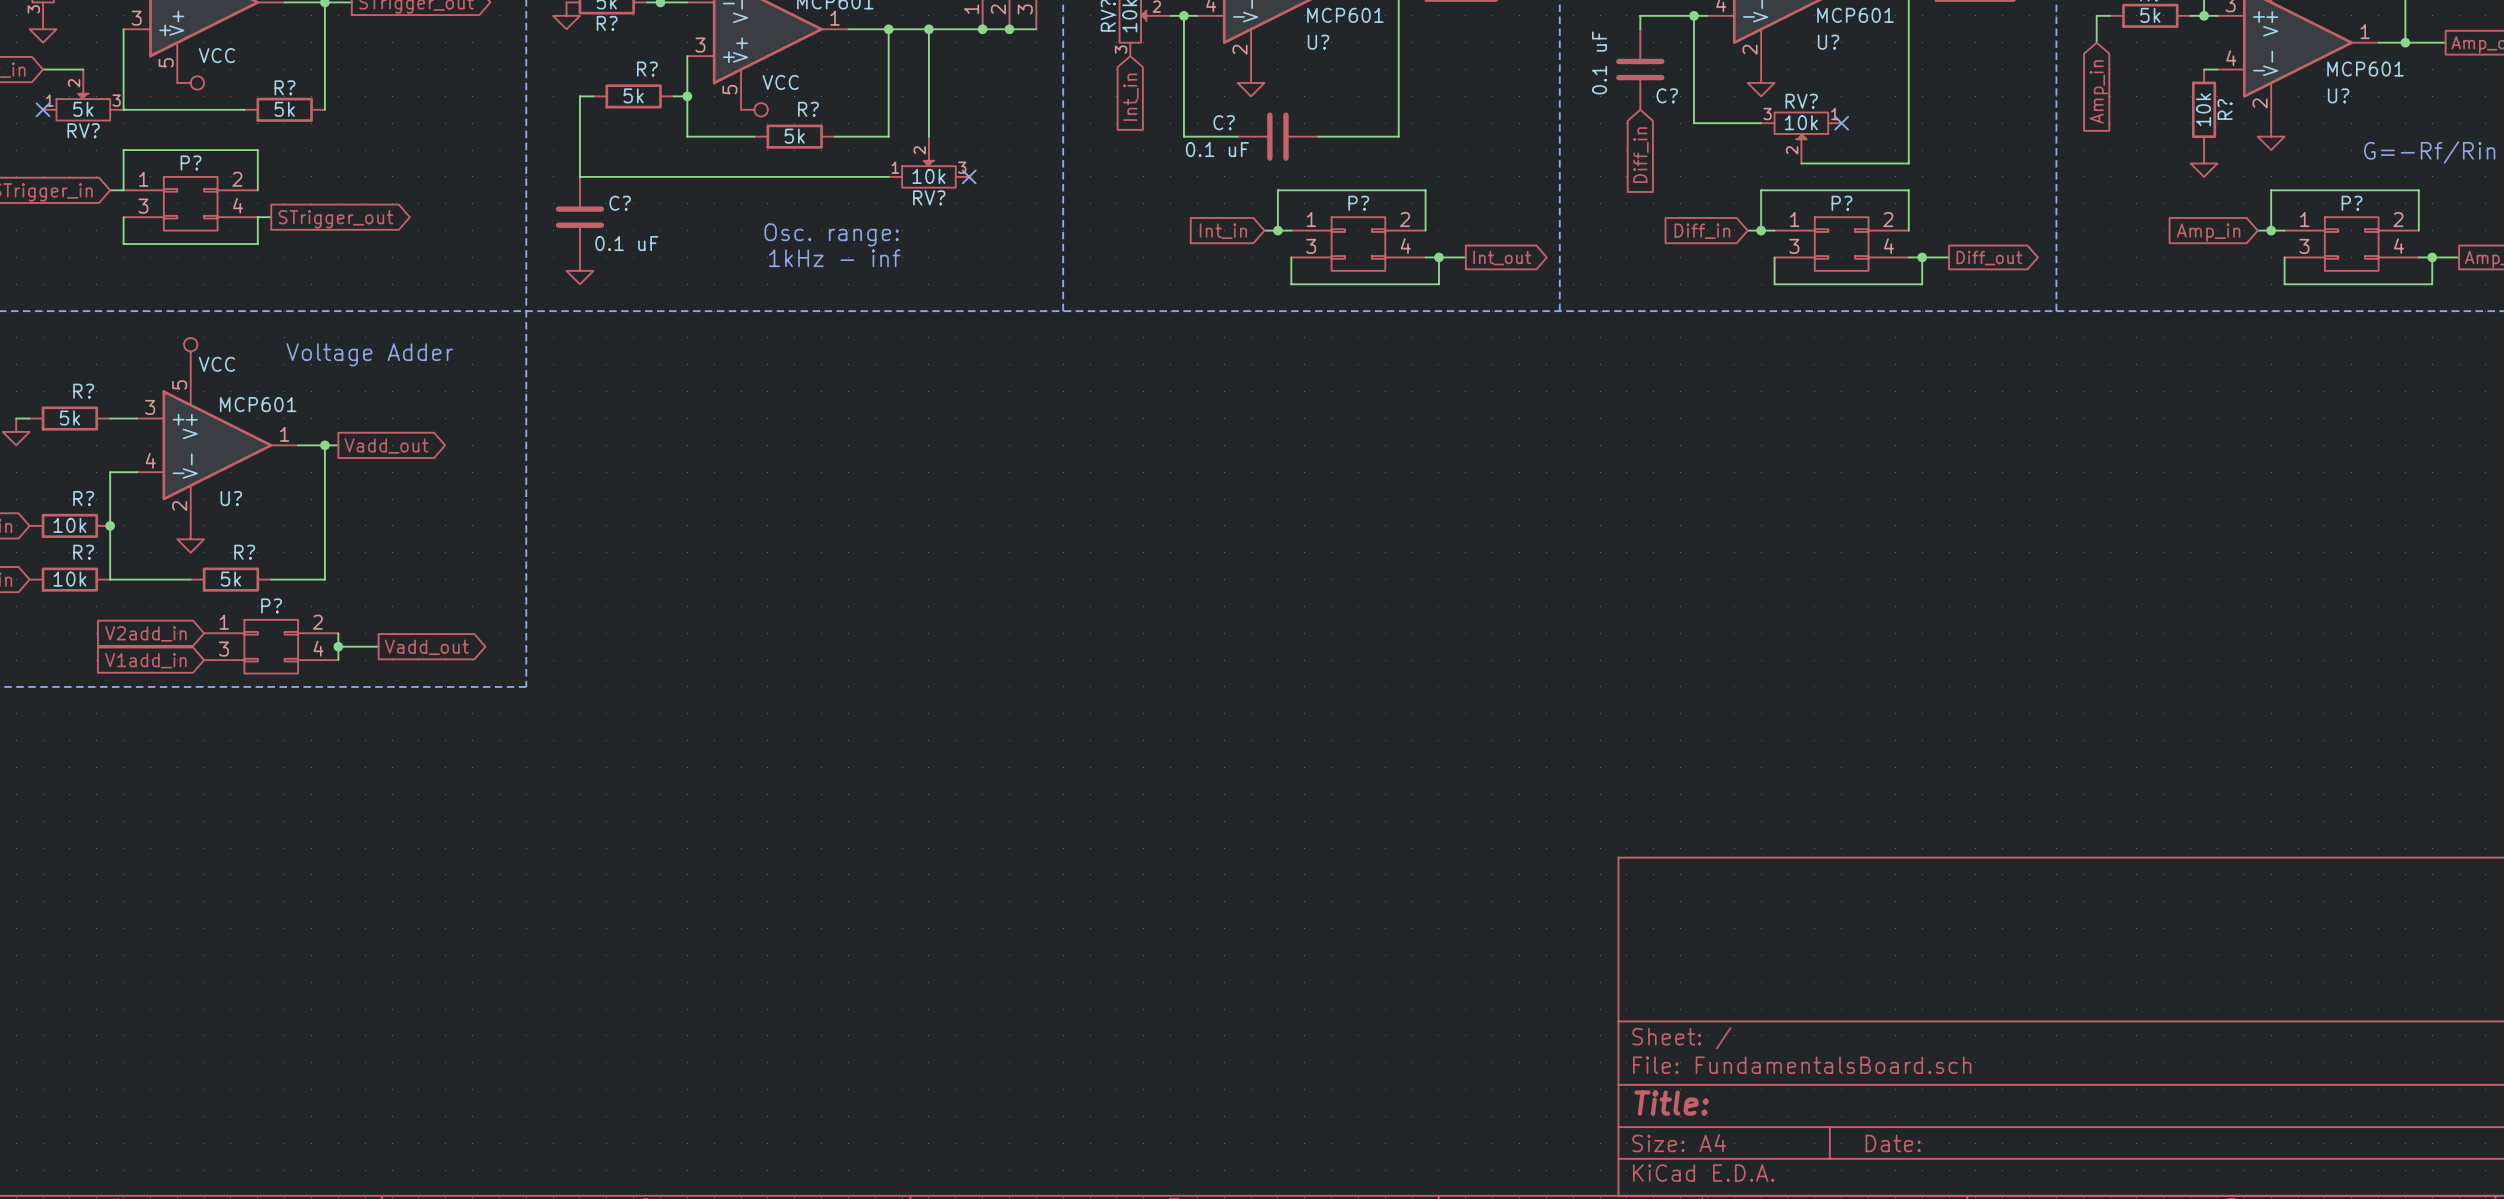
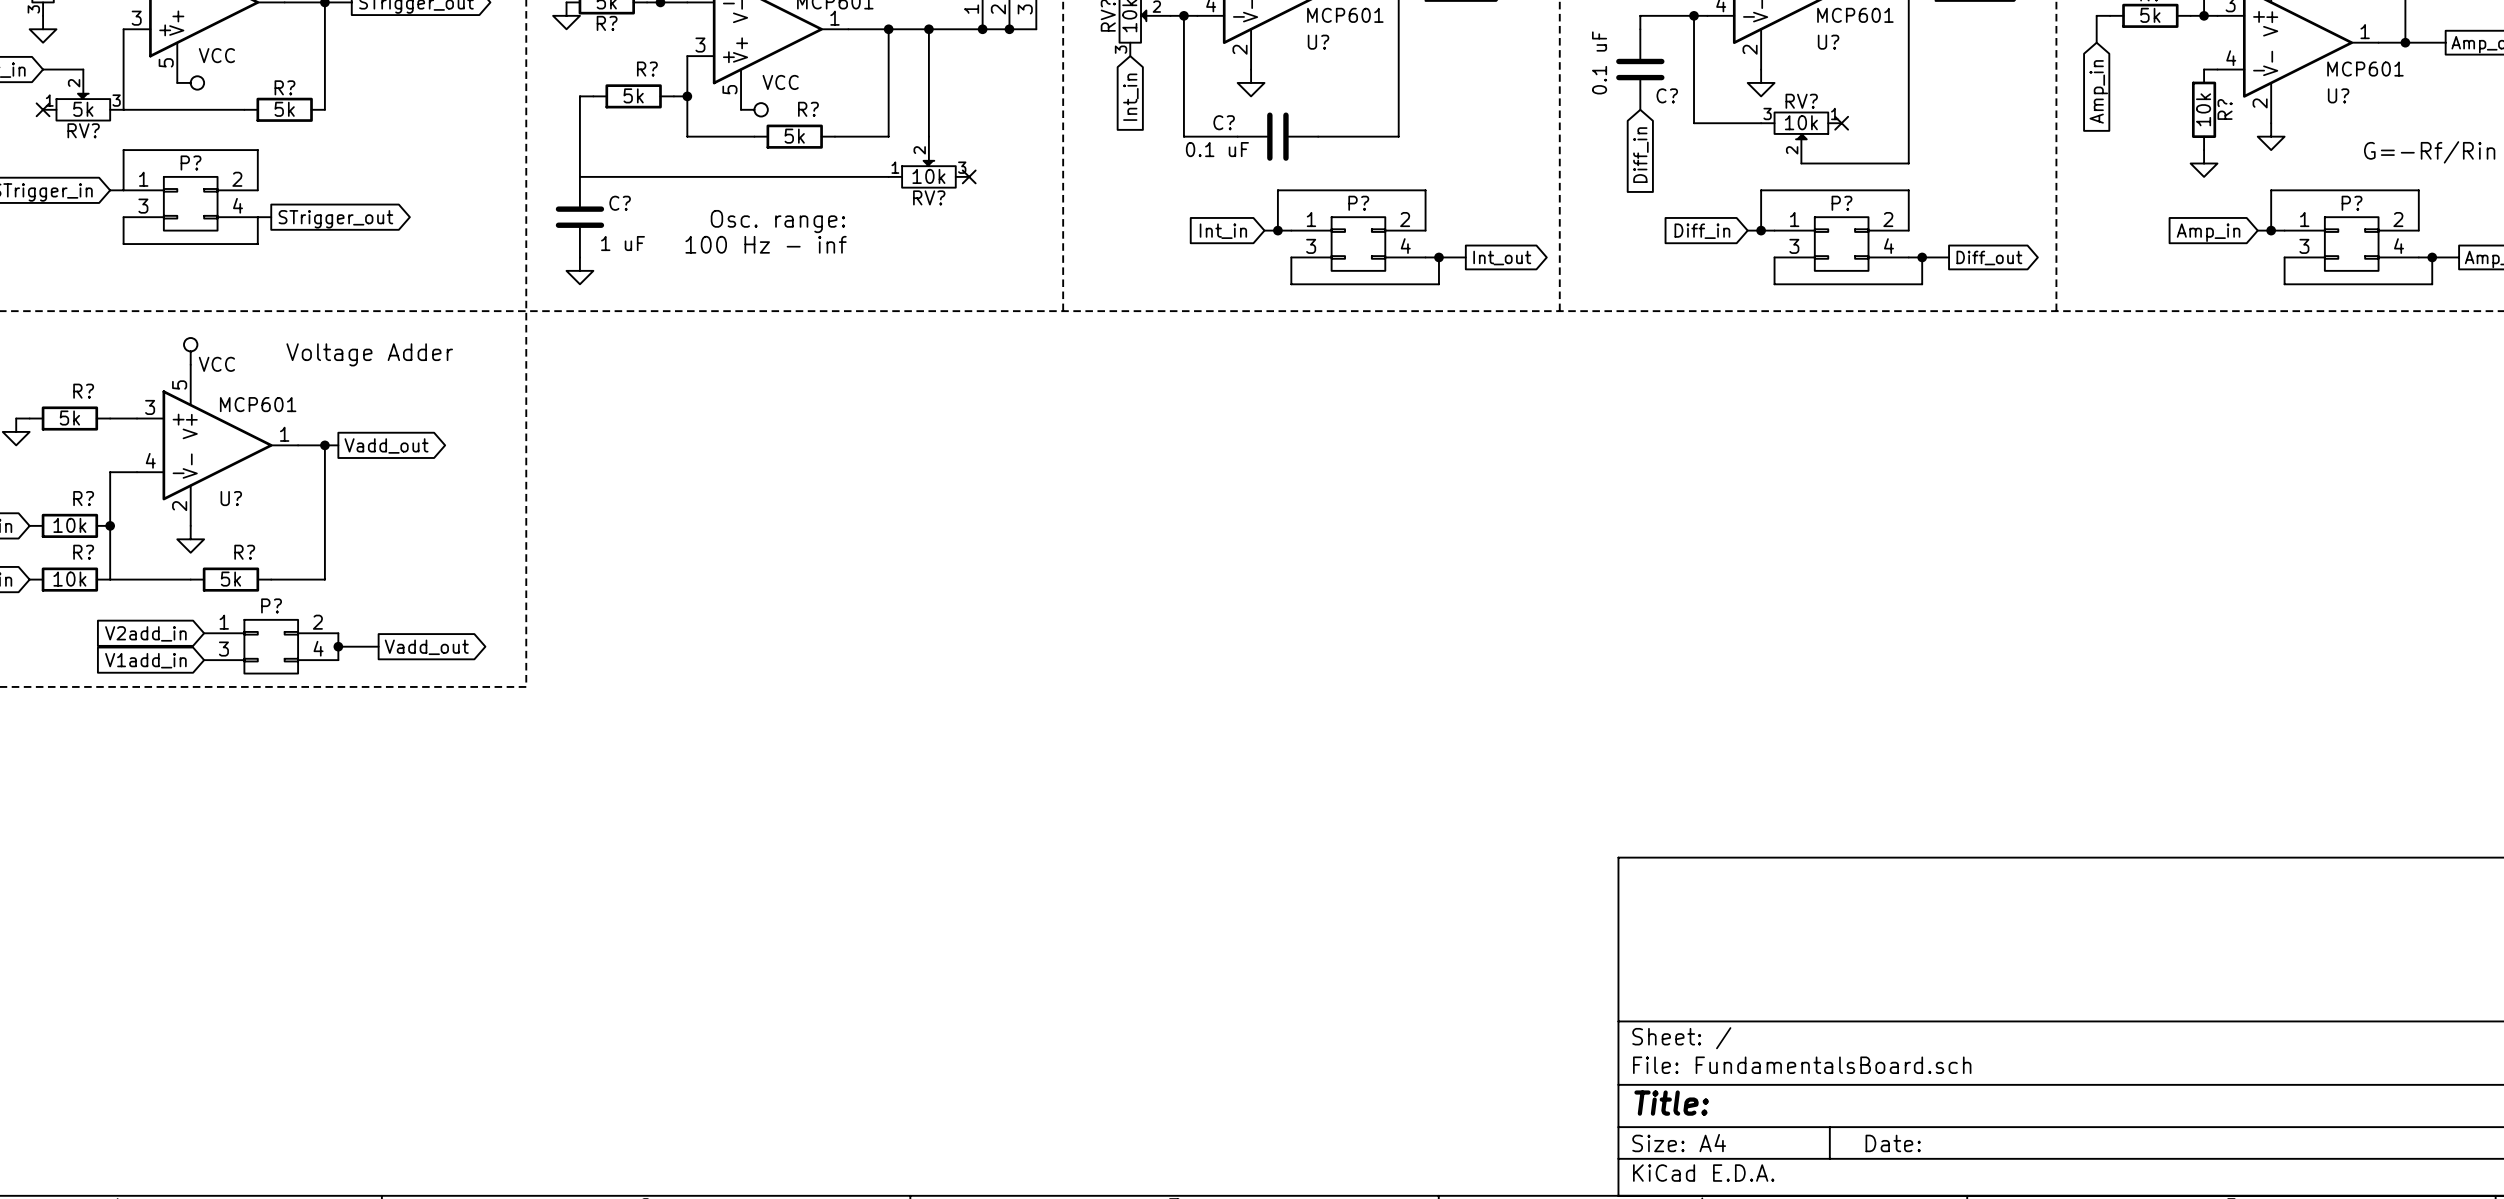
text position: Osc. range: (831, 234) -> Osc. range: (777, 221)
C? value: 0.1 uF (626, 243) -> 1 uF (622, 243)
text: 1kHz - inf (834, 258) -> 100 Hz - inf (766, 244)

